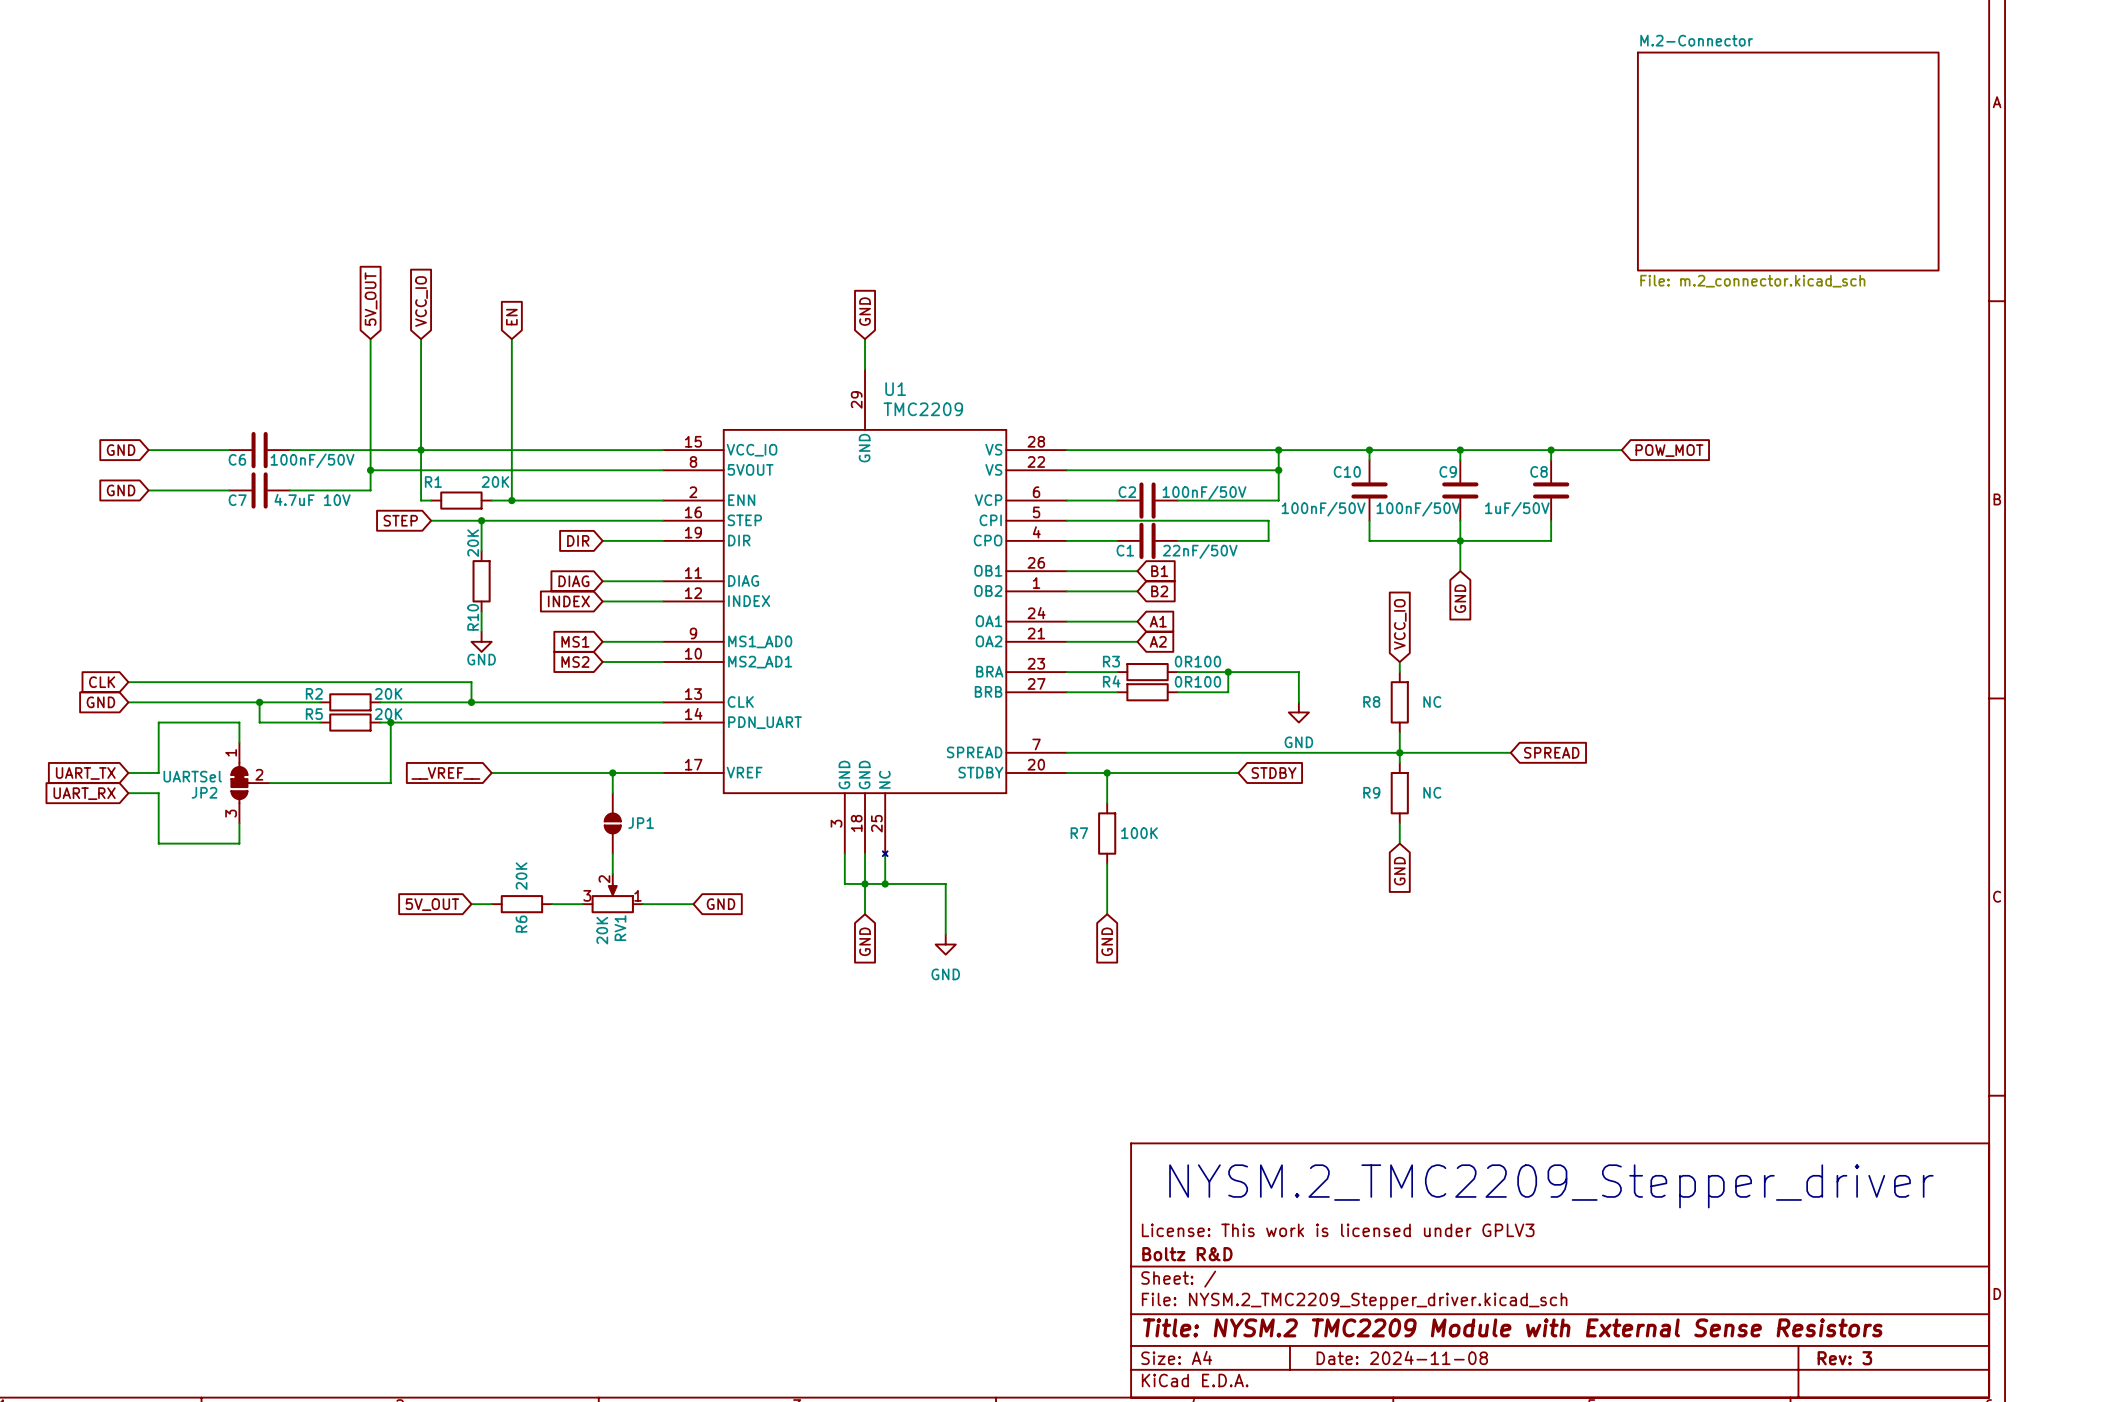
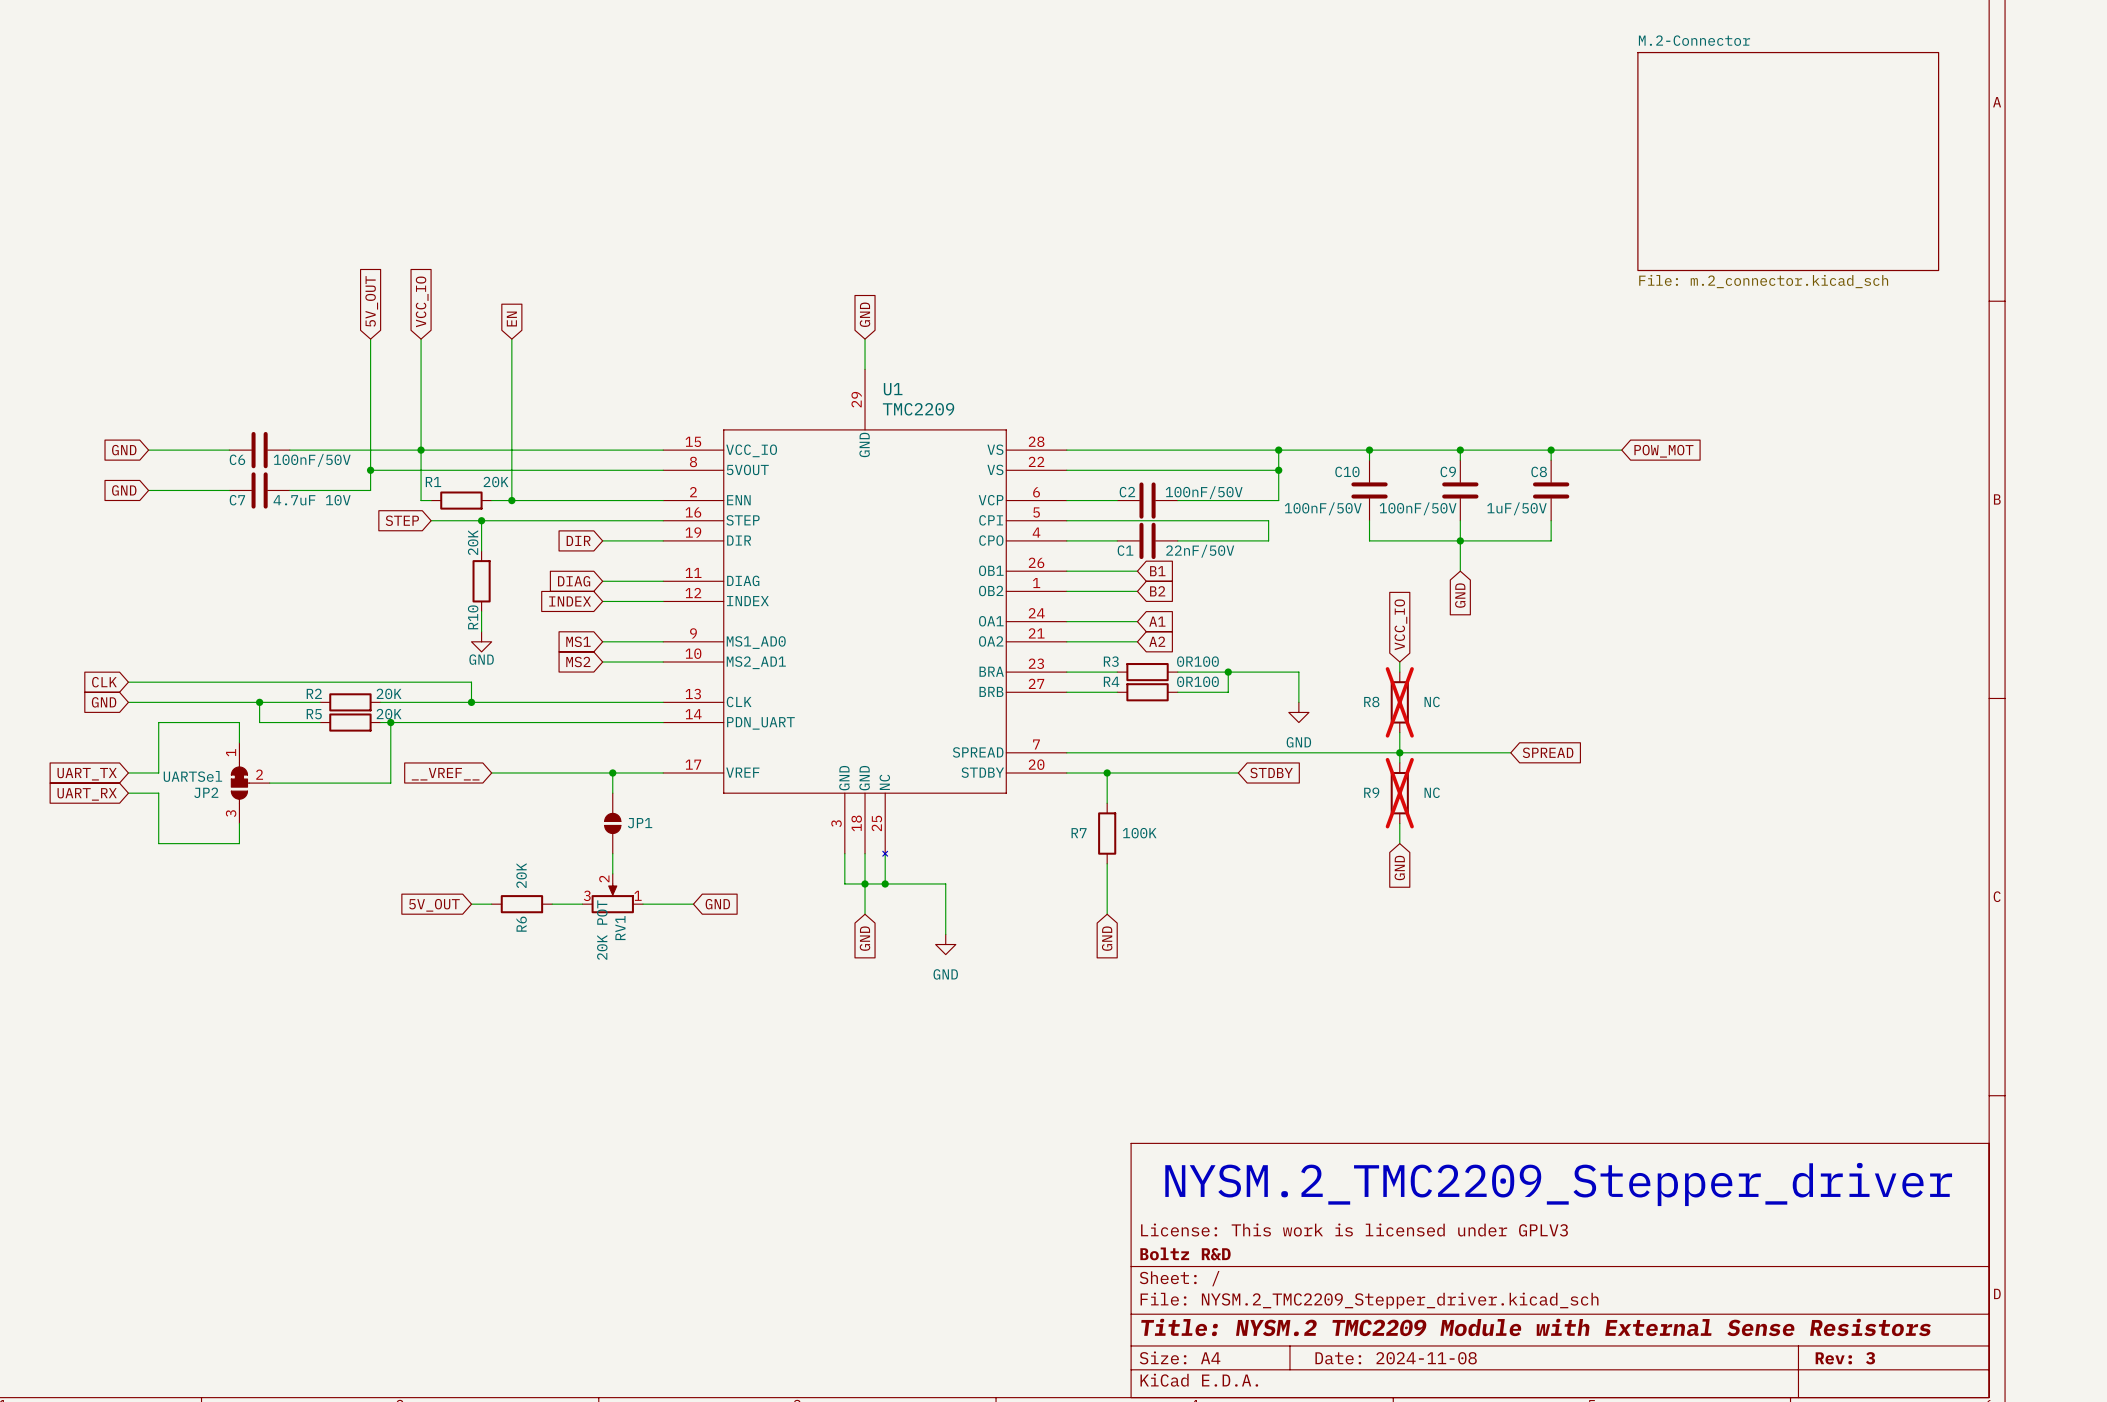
R8 do-not-place cross: none -> (1399, 702)
R9 do-not-place cross: none -> (1399, 793)
RV1 value: 20K (602, 930) -> 20K POT (602, 930)

